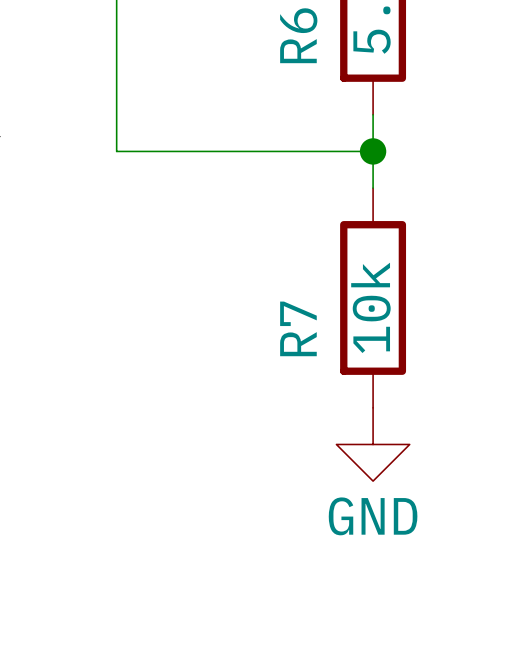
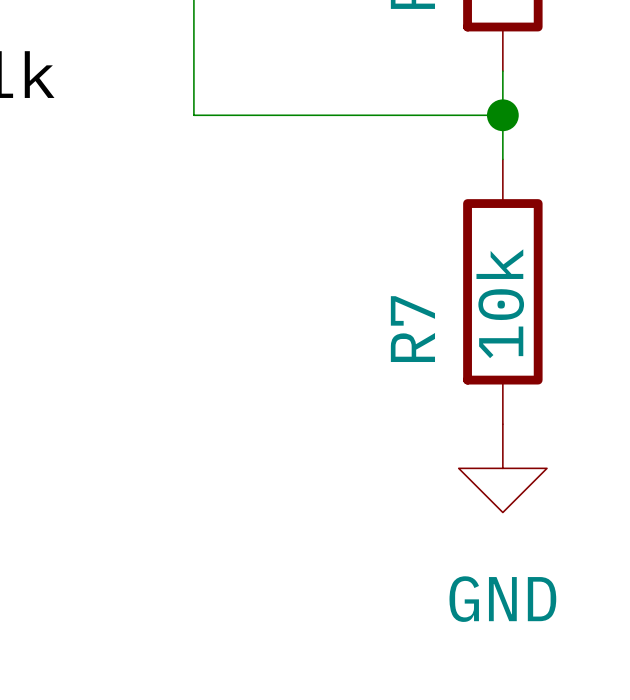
power symbol text position: GND (373, 516) -> GND (502, 599)

